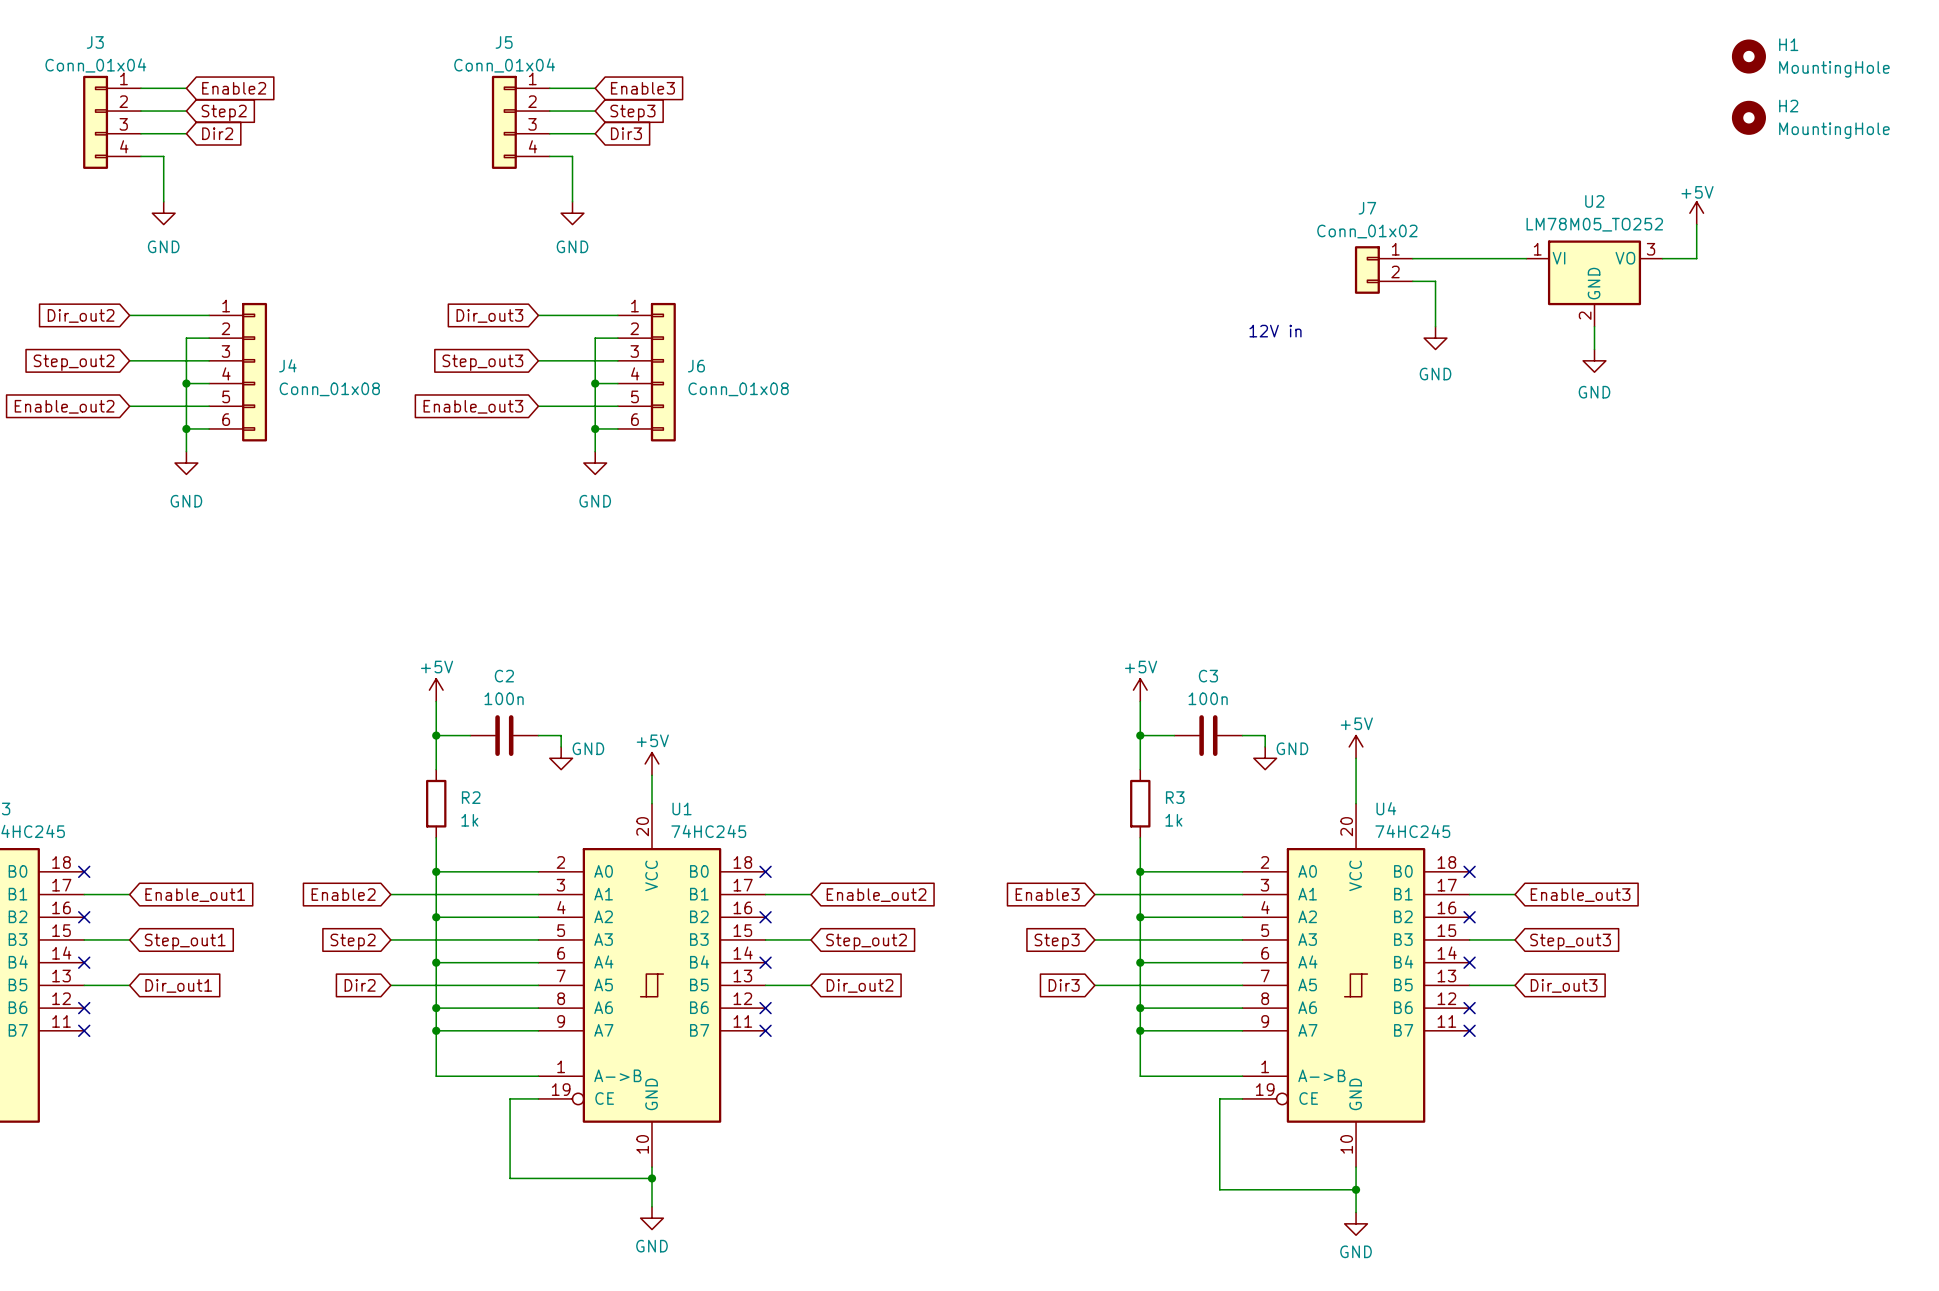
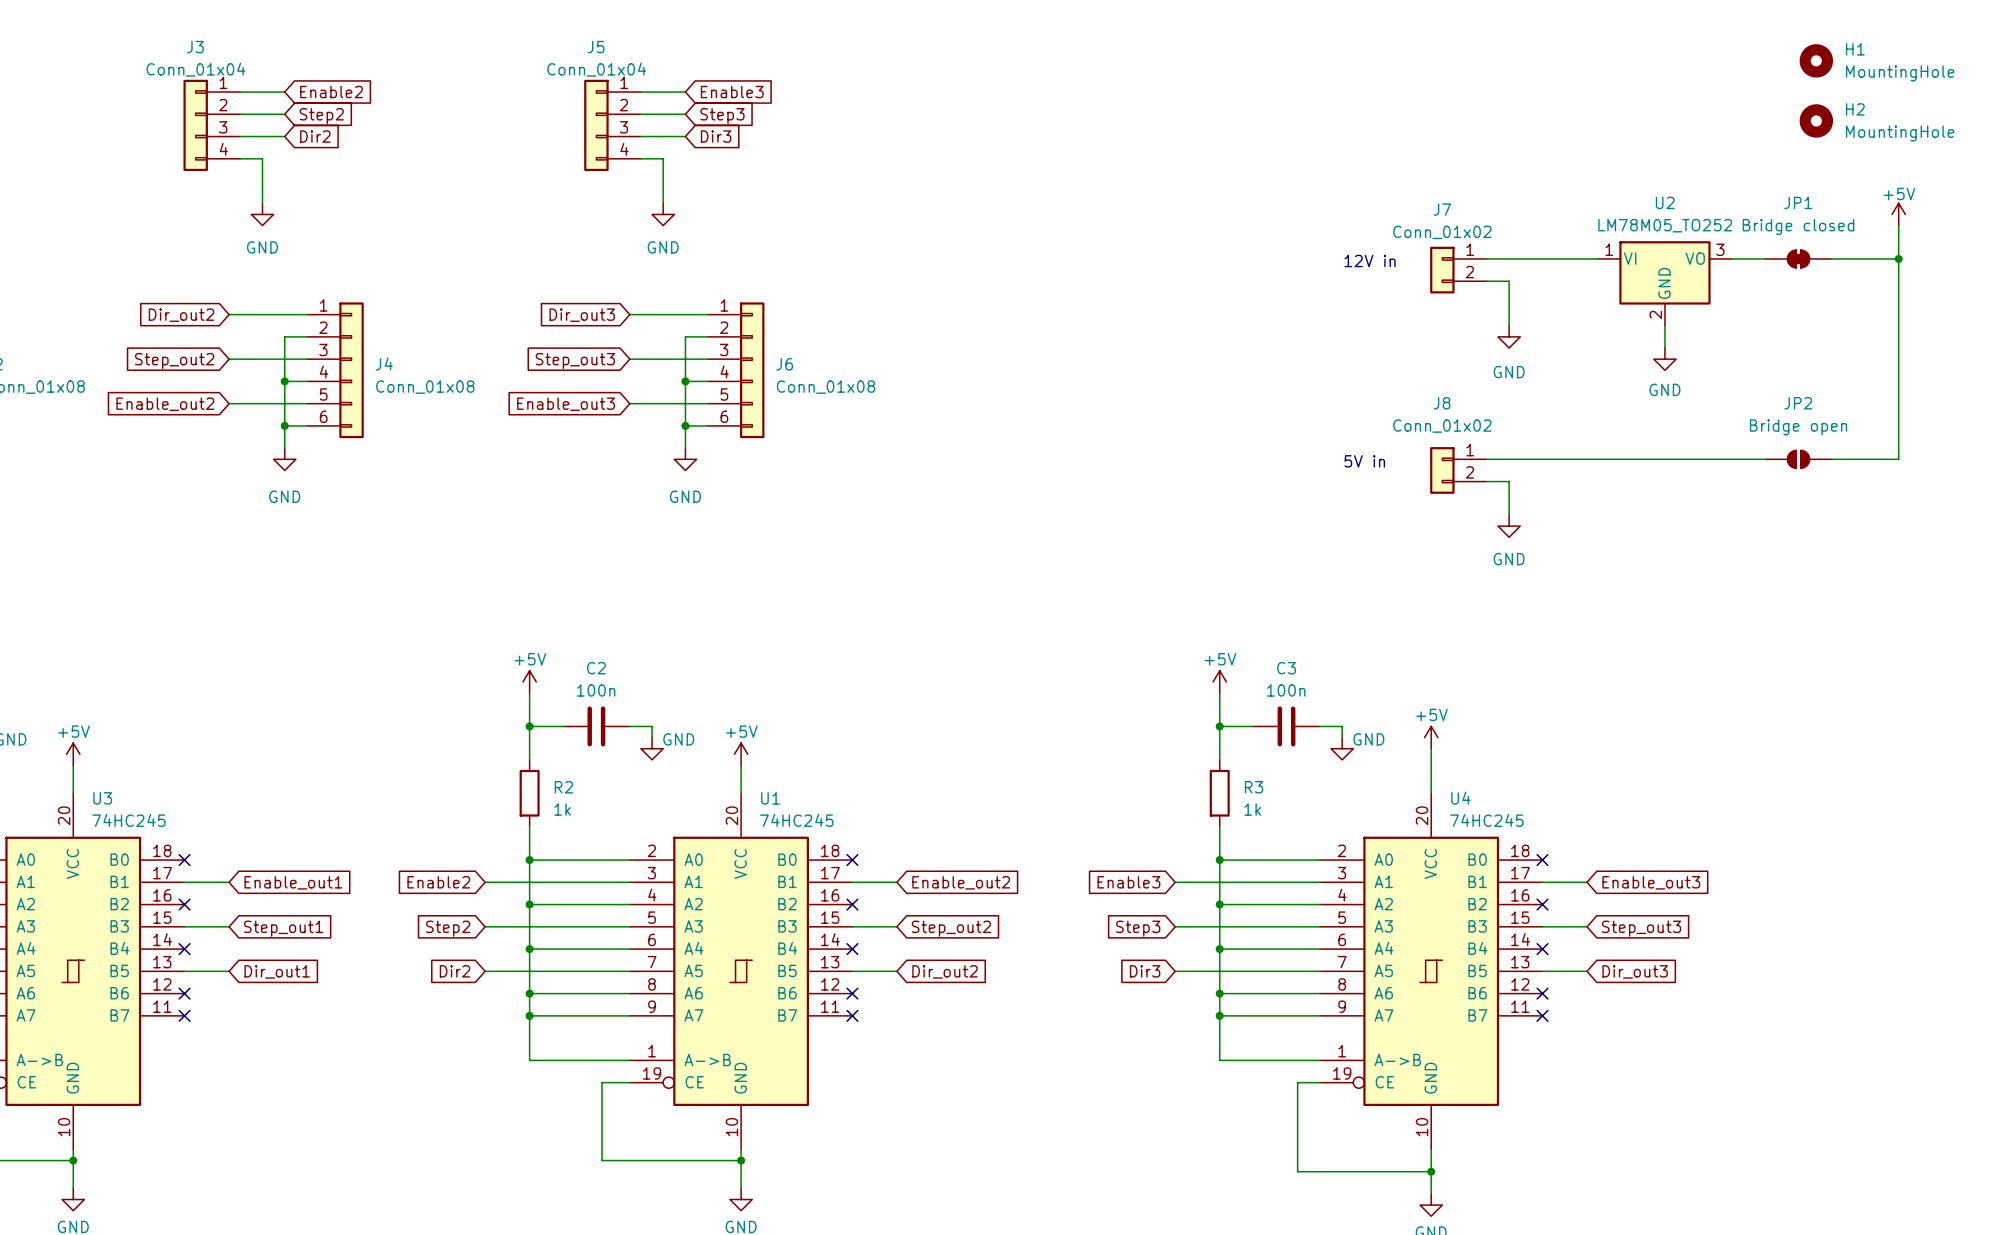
power symbol position: +5V (1696, 213) -> +5V (1898, 214)
wire: (1696, 224) (1696, 258) -> none
wire: none -> (1898, 225) (1898, 459) (1831, 459)
JP1: none -> Bridge closed (1798, 258)
wire: none -> (1831, 258) (1898, 258)
junction: none -> (1898, 258)
text position: 12V in (1275, 331) -> 12V in (1370, 260)
wire: none -> (1486, 459) (1765, 459)
JP2: none -> Bridge open (1798, 459)
text: none -> 5V in (1364, 461)
J8: none -> Conn_01x02 (1458, 470)
wire: none -> (1486, 481) (1509, 481) (1509, 514)
power symbol: none -> GND (1509, 526)

